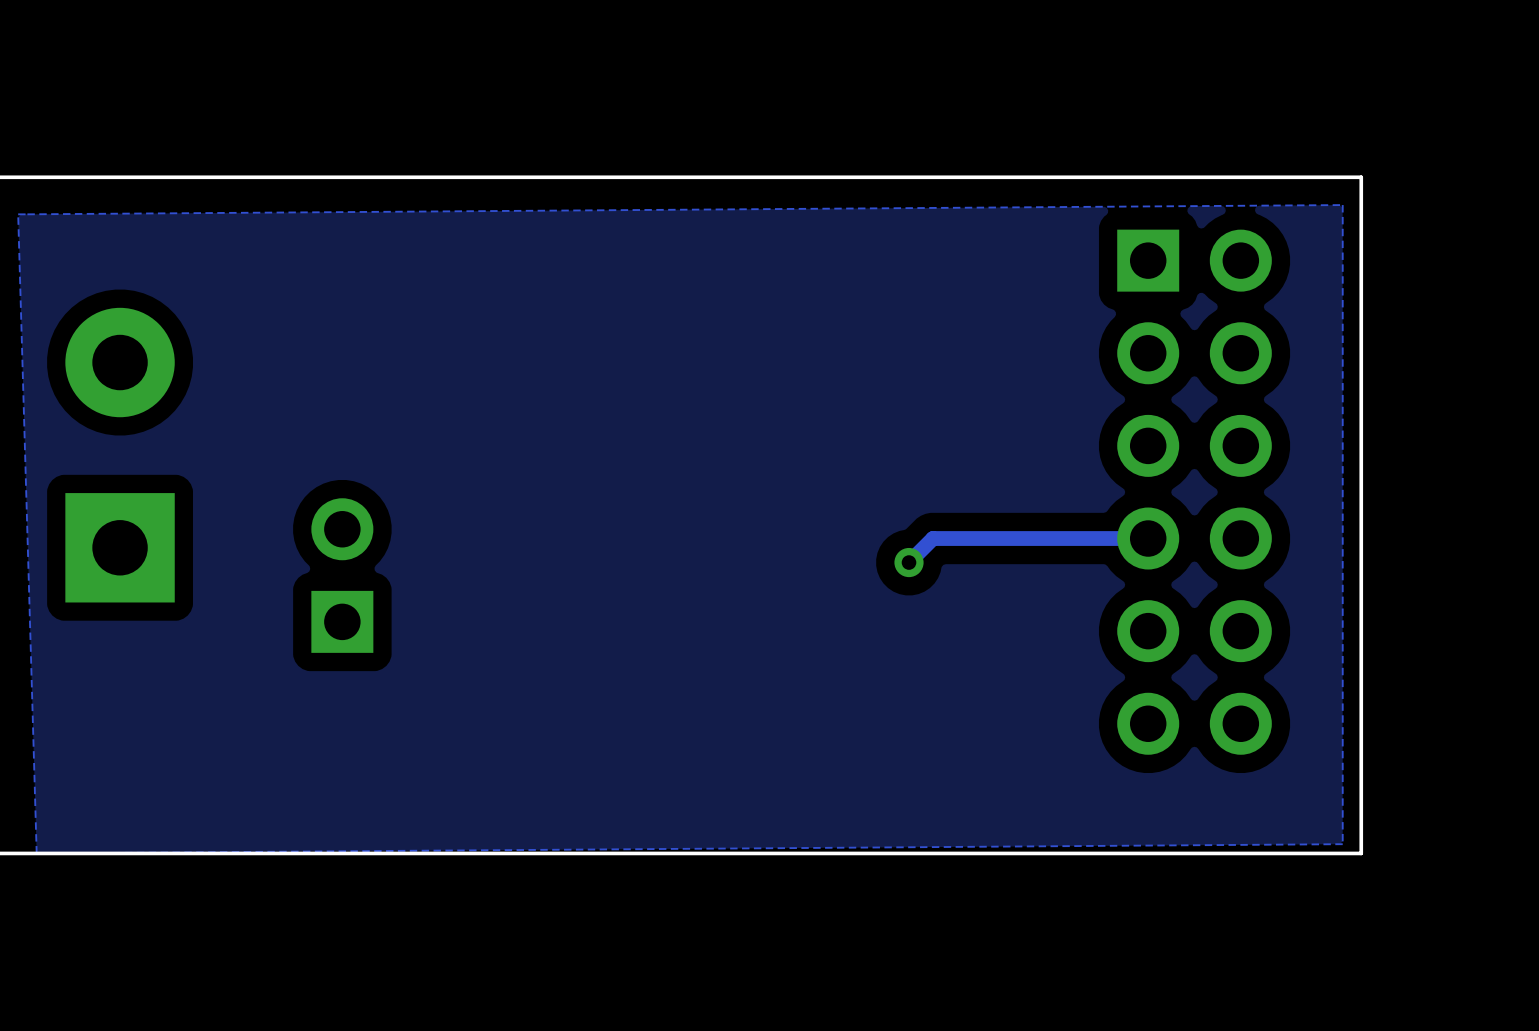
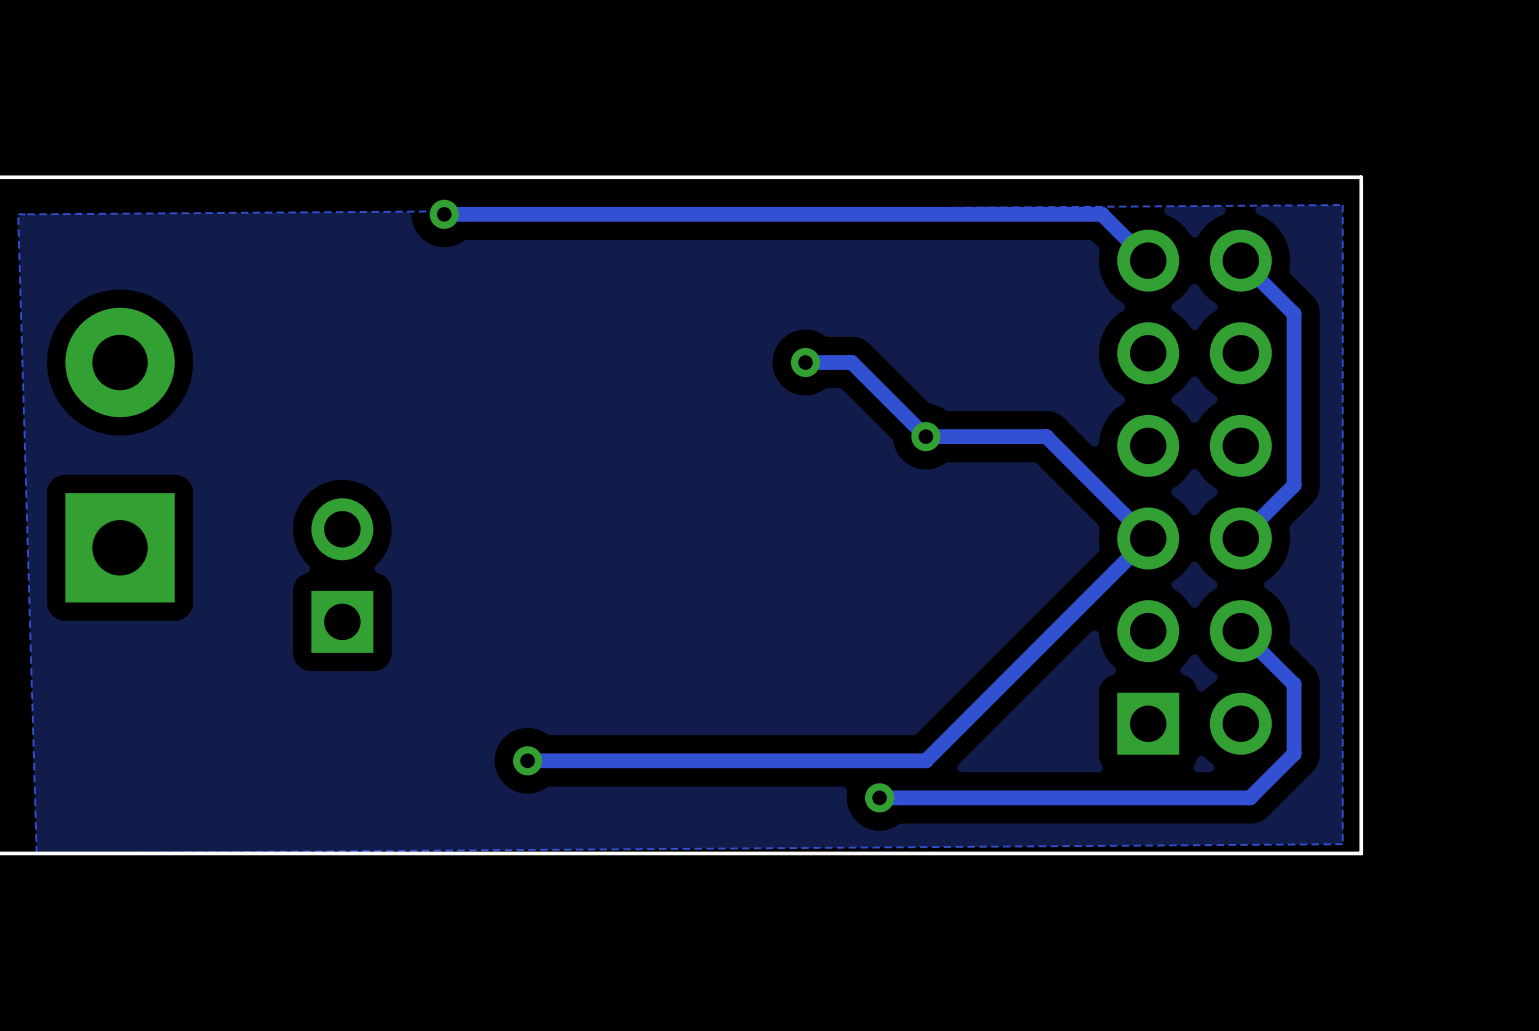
track: none -> (444, 214) (1101, 214) (1148, 260)
via: none -> (444, 214)
part footprint: [1117, 229, 1272, 755] -> [1117, 229, 1272, 755]
track: none -> (1240, 260) (1294, 313) (1294, 485) (1240, 538)
track: none -> (805, 362) (851, 362) (925, 436) (1046, 436) (1148, 538) (925, 760) (527, 760)
via: none -> (805, 362)
via: none -> (925, 436)
track: (1148, 538) (933, 538) (909, 562) -> none
via: (909, 562) -> none
track: none -> (1240, 631) (1294, 684) (1294, 753) (1250, 797) (879, 797)
via: none -> (527, 760)
via: none -> (879, 797)

